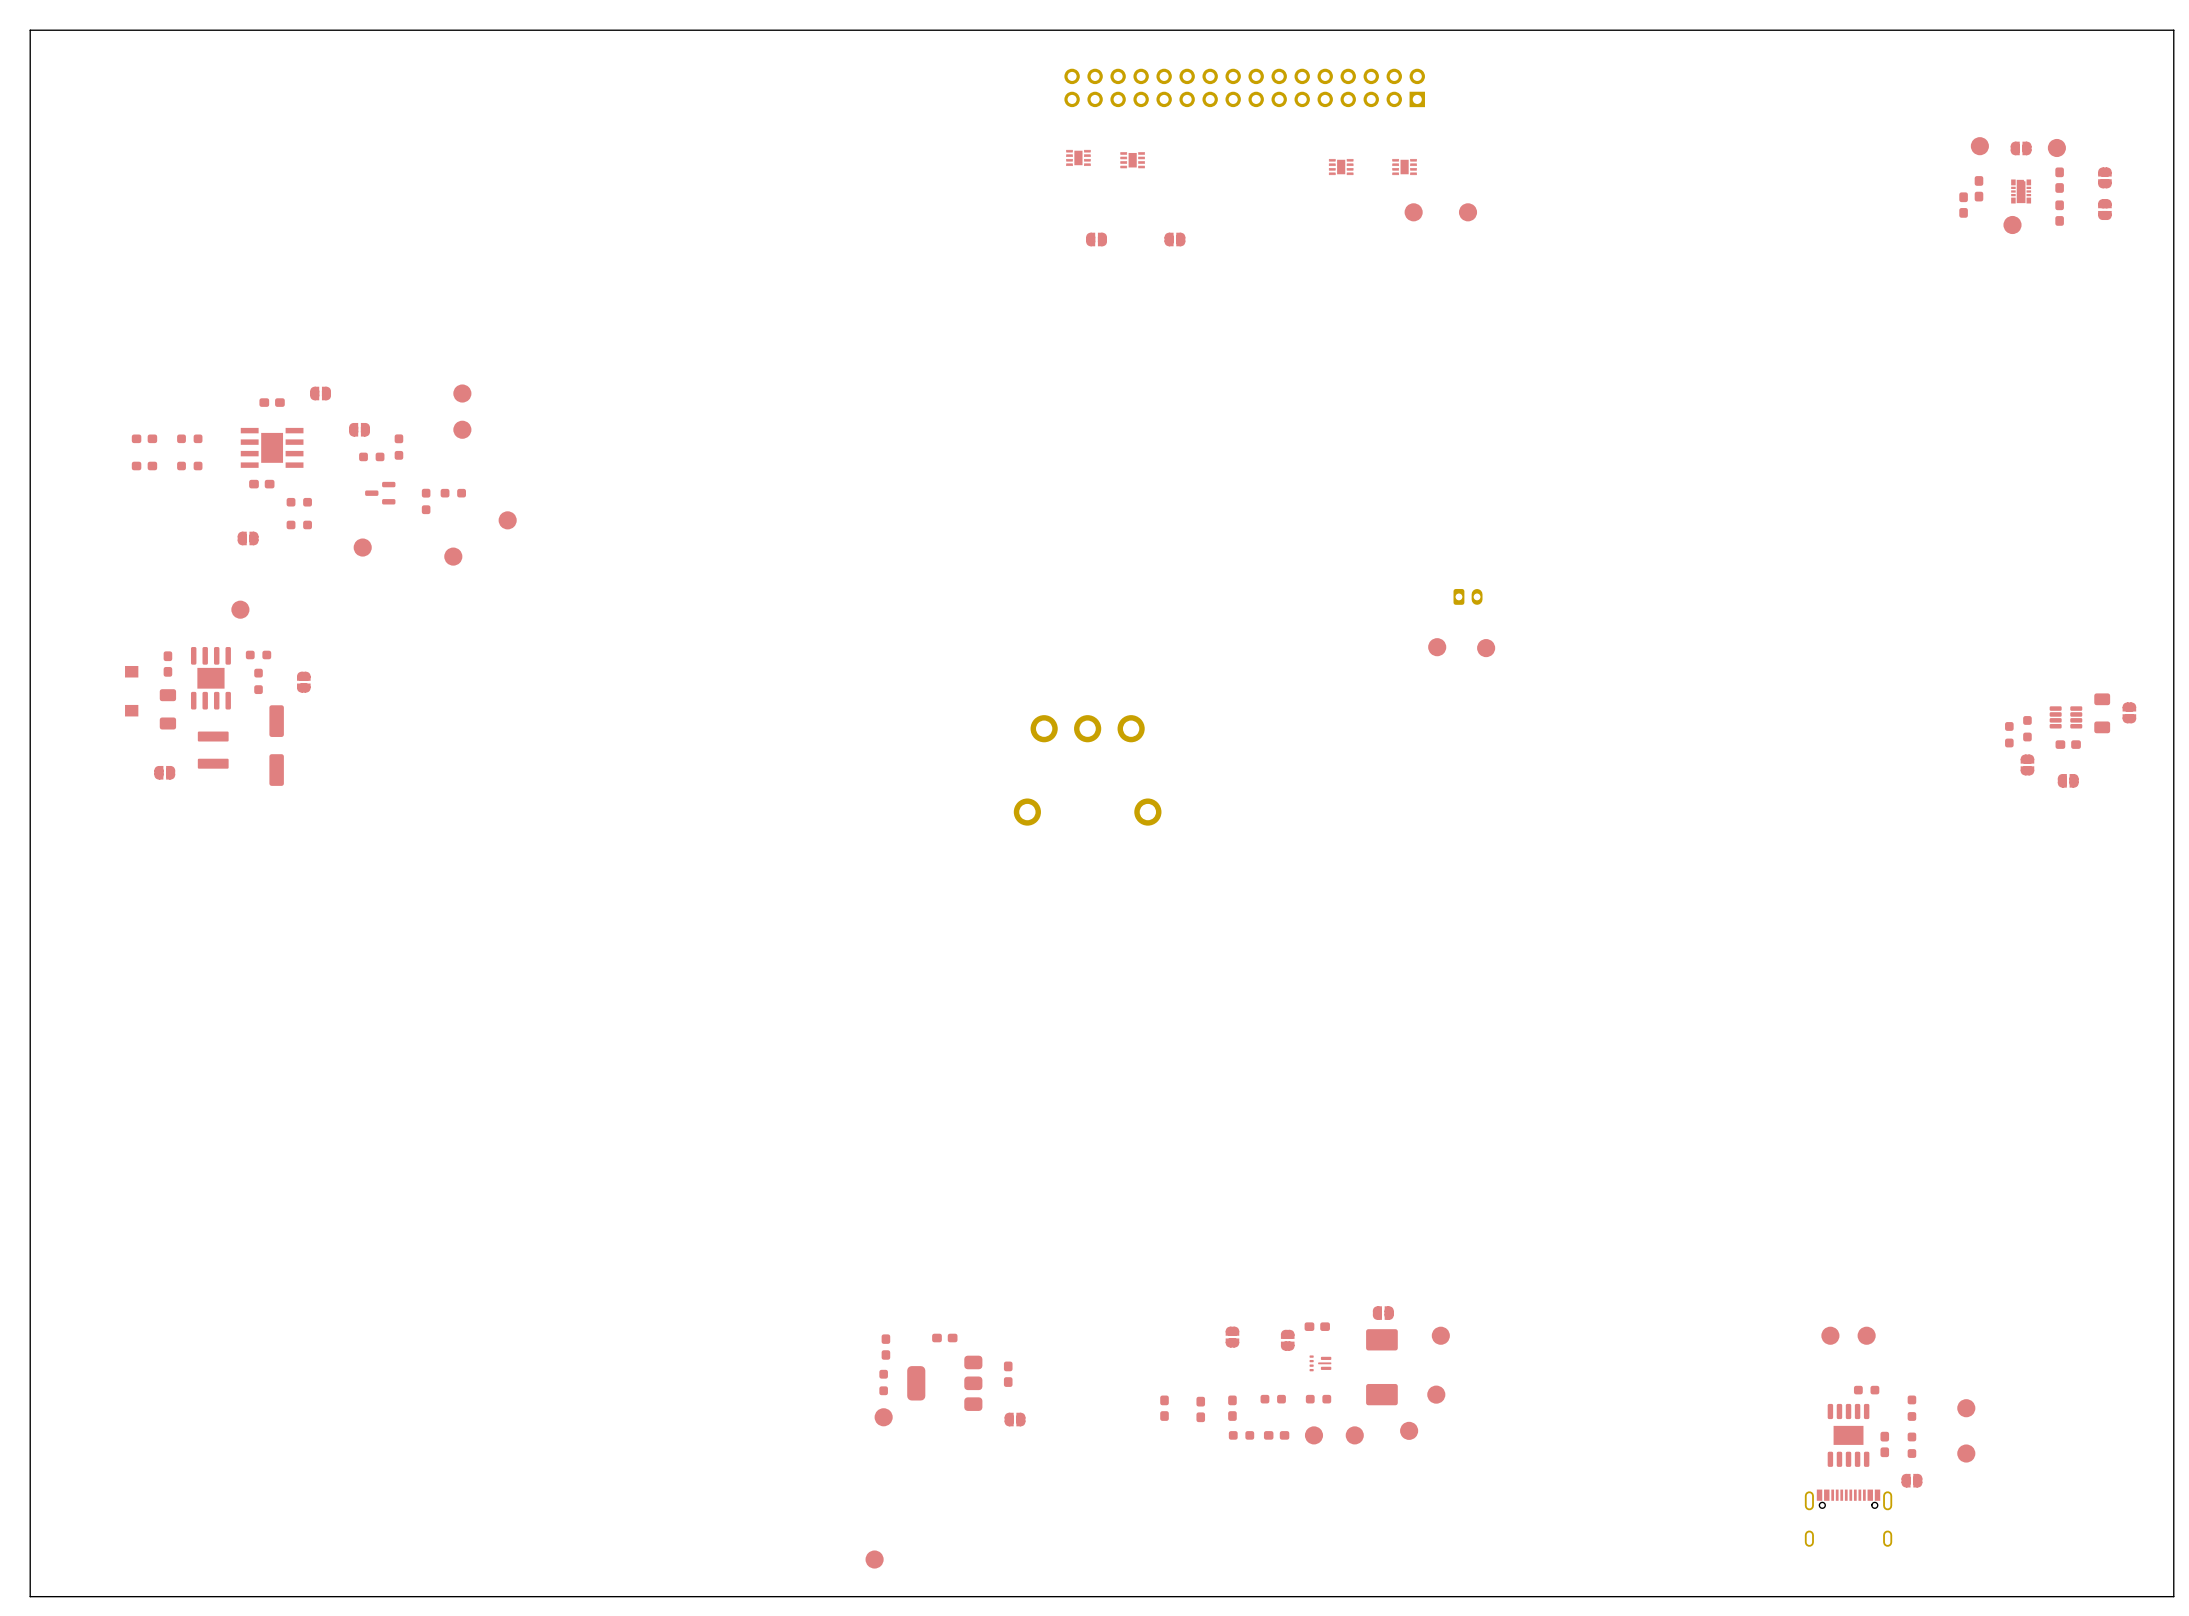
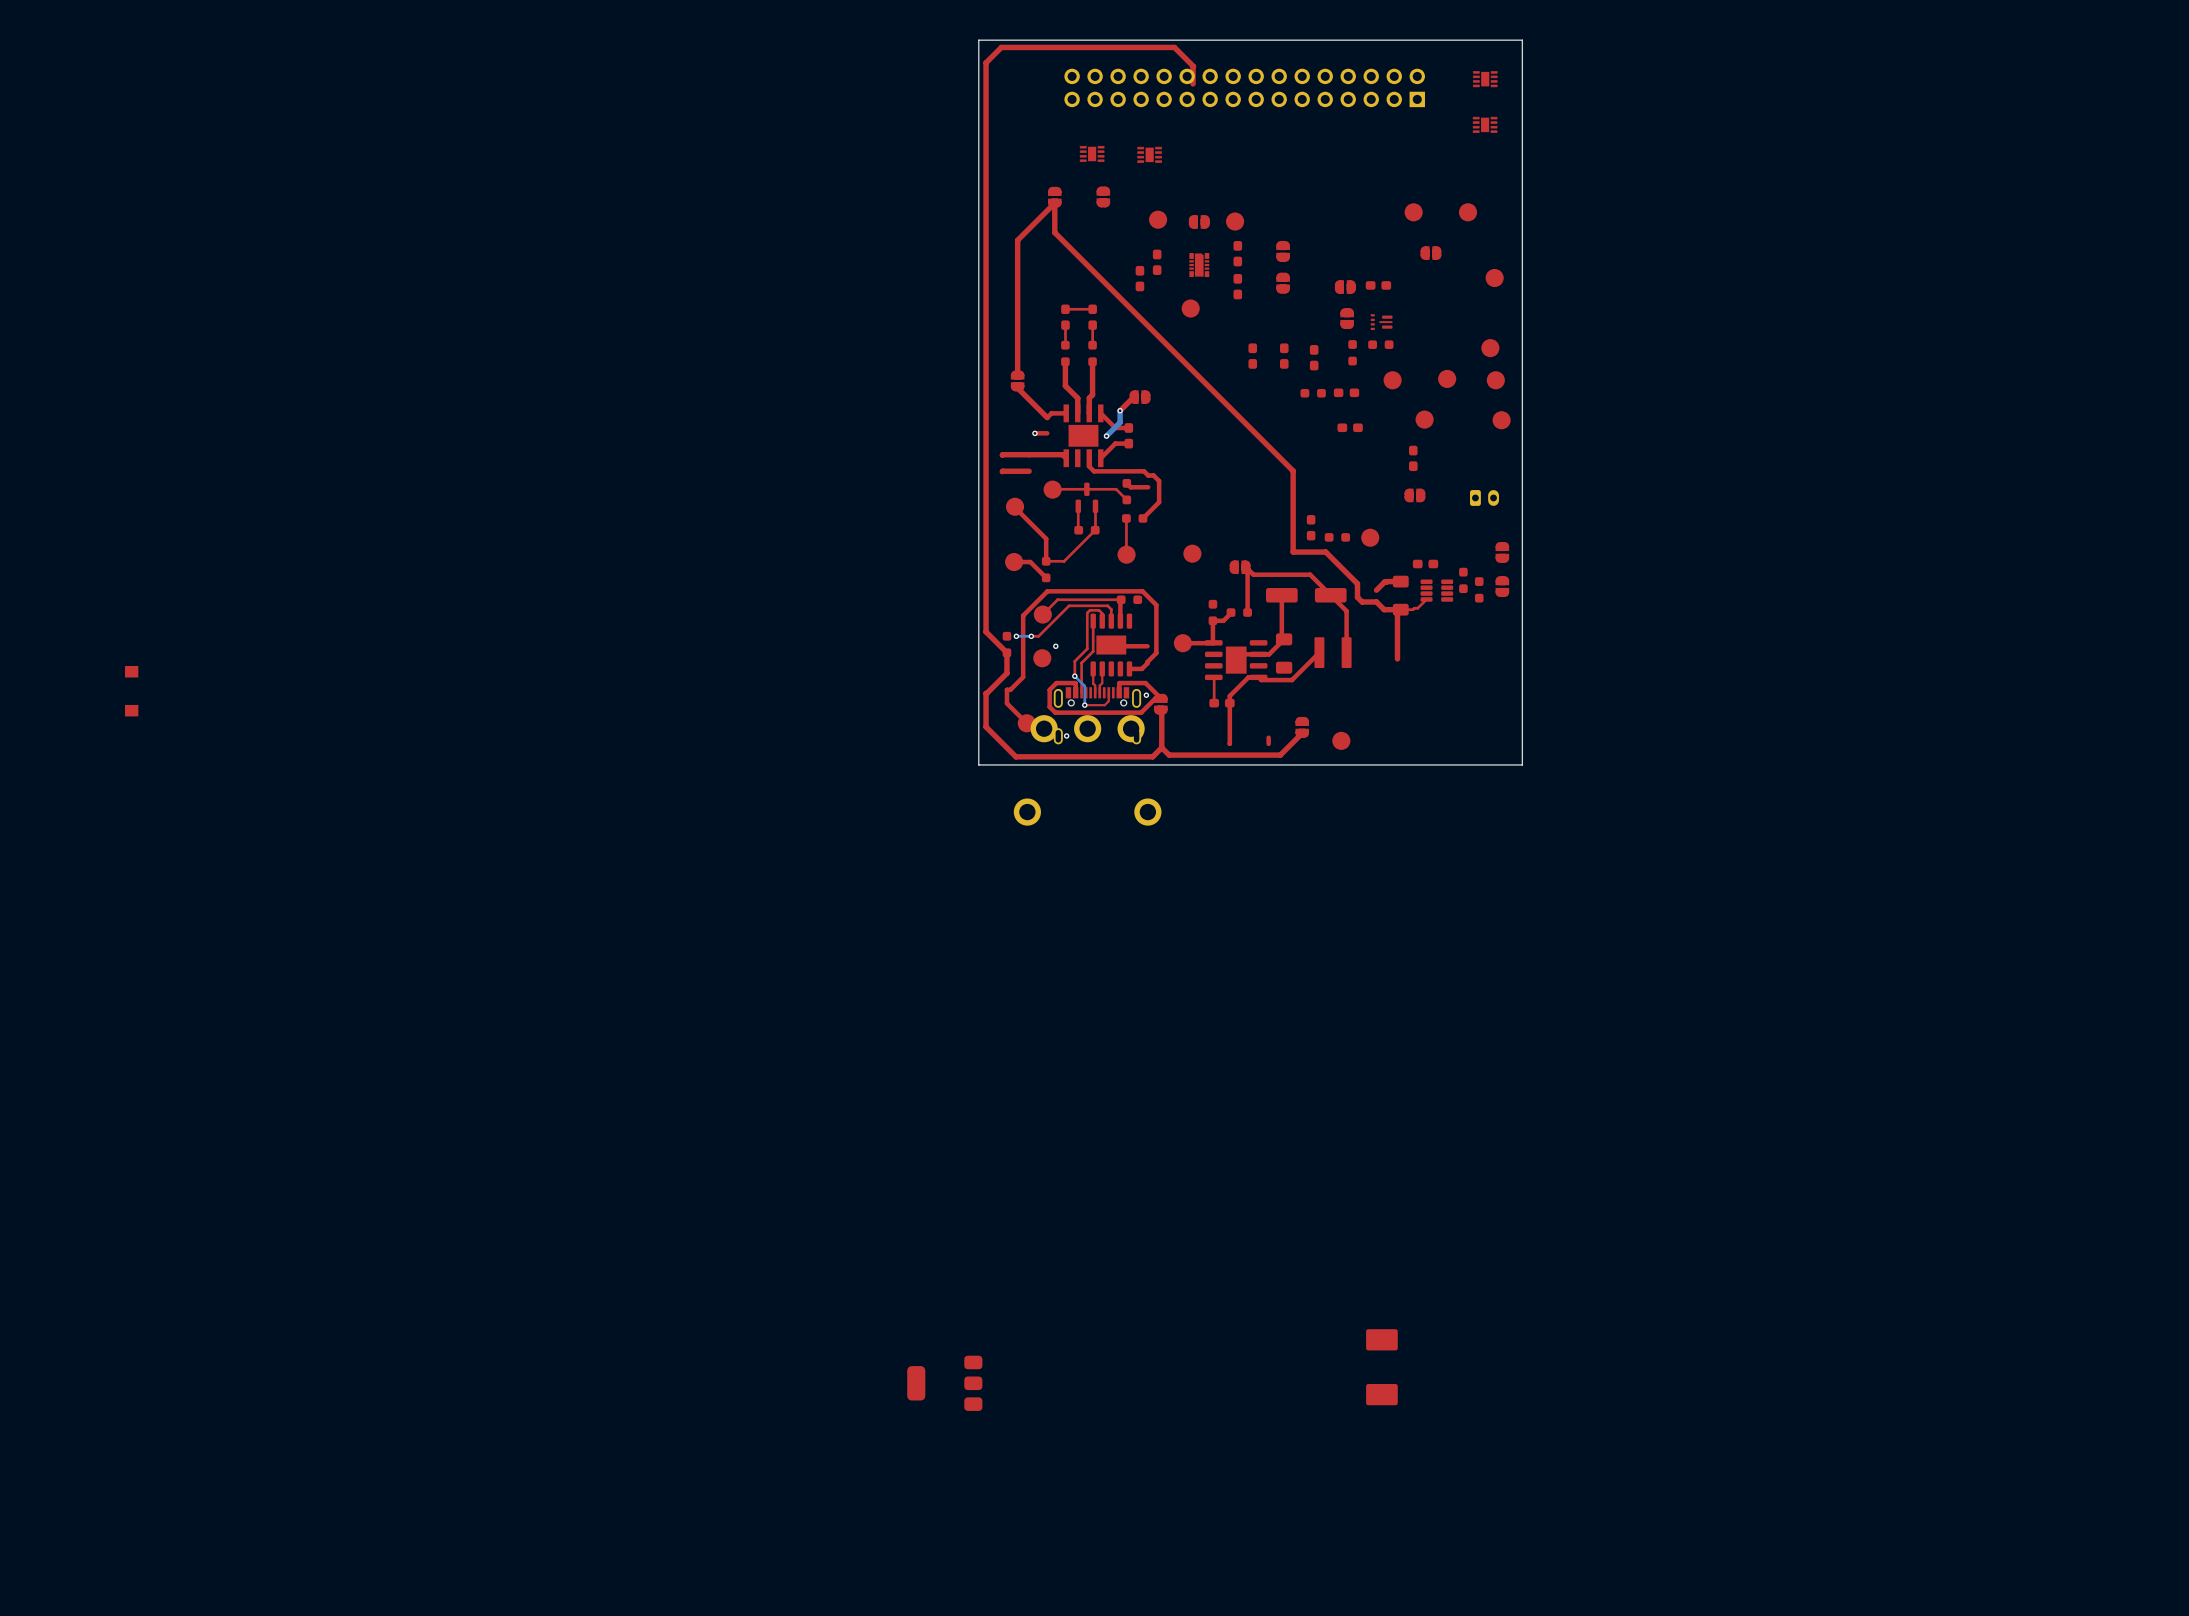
board edge: (2173, 30) (30, 30) (30, 1596) (2173, 1596) (2173, 30) -> none
board edge: none -> (1522, 40) (978, 40) (978, 764) (1522, 764) (1522, 40)
part: none -> (1485, 79)
top track: none -> (1193, 83) (1193, 66) (1174, 47) (1001, 47) (986, 62) (986, 631) (1006, 652) (1006, 673) (986, 693) (986, 726) (1015, 756) (1152, 756) (1161, 747)
part: none -> (1485, 124)
part: (1979, 146) -> none
part: (2056, 147) -> none
part: (2021, 148) -> none
part position: (1078, 157) -> (1092, 153)
part position: (1132, 160) -> (1149, 154)
part: (1341, 167) -> none
part: (1404, 167) -> none
part: (2104, 177) -> none
part: (2059, 180) -> none
part: (1978, 188) -> none
part: (2021, 191) -> none
part: none -> (1054, 197)
part: none -> (1103, 197)
part: (1963, 205) -> none
part: (2104, 209) -> none
part: (2059, 213) -> none
part: none -> (1158, 219)
part: none -> (1235, 221)
part: (2012, 225) -> none
part: (1096, 239) -> none
part position: (1174, 239) -> (1199, 221)
part: none -> (1283, 251)
part: none -> (1237, 253)
part: none -> (1430, 253)
part: none -> (1157, 262)
part: none -> (1199, 265)
part: none -> (1139, 278)
part: none -> (1494, 278)
part: none -> (1283, 283)
part: none -> (1378, 285)
part: none -> (1237, 286)
part: none -> (1345, 287)
part: none -> (1190, 308)
top track: none -> (1092, 309) (1065, 309)
part: none -> (1065, 317)
part: none -> (1092, 317)
part: none -> (1347, 318)
part: none -> (1381, 322)
top track: none -> (1065, 325) (1065, 345)
top track: none -> (1092, 325) (1092, 345)
part: none -> (1380, 344)
part: none -> (1490, 348)
part: none -> (1352, 352)
part: none -> (1065, 353)
part: none -> (1092, 353)
part: none -> (1252, 356)
part: none -> (1284, 356)
part: none -> (1314, 357)
top track: none -> (1065, 361) (1065, 385) (1077, 398) (1077, 413)
top track: none -> (1092, 361) (1092, 394) (1089, 398) (1089, 413)
top track: none -> (1017, 375) (1017, 240) (1054, 203) (1054, 232) (1293, 471) (1293, 552) (1325, 552) (1357, 583) (1357, 597) (1362, 601) (1376, 601) (1384, 609) (1400, 609)
part: none -> (1447, 378)
part: none -> (1017, 380)
part: none -> (1392, 380)
part: none -> (1495, 380)
top track: none -> (1017, 386) (1047, 417) (1051, 413) (1066, 413)
part: none -> (1346, 392)
part: (320, 393) -> none
part: (462, 393) -> none
part: none -> (1313, 393)
top track: none -> (1134, 397) (1120, 410)
part: none -> (1140, 397)
part: (272, 402) -> none
bottom track: none -> (1120, 410) (1120, 422) (1106, 436)
via: none -> (1120, 410)
top track: none -> (1100, 413) (1115, 427) (1128, 427)
part: none -> (1424, 419)
part: none -> (1501, 420)
part: none -> (1350, 427)
part: (359, 429) -> none
part: (462, 429) -> none
via: none -> (1034, 433)
top track: none -> (1047, 433) (1035, 433)
part: none -> (1083, 435)
part: none -> (1128, 435)
via: none -> (1106, 436)
part: (144, 438) -> none
part: (189, 438) -> none
top track: none -> (1128, 443) (1115, 443) (1100, 458)
part: (272, 447) -> none
part: (398, 447) -> none
top track: none -> (1002, 455) (1062, 454) (1066, 458)
part: (371, 456) -> none
top track: none -> (1089, 458) (1089, 466) (1094, 471) (1144, 471) (1148, 475) (1153, 475) (1159, 481) (1159, 502) (1142, 518)
part: none -> (1413, 458)
part: (144, 465) -> none
part: (189, 465) -> none
top track: none -> (1029, 471) (1002, 471)
top track: none -> (1126, 483) (1130, 487) (1148, 487)
part: (261, 484) -> none
top track: none -> (1052, 489) (1116, 489) (1126, 499)
part: none -> (1052, 489)
part: none -> (1126, 491)
part: (380, 493) -> none
part: (453, 493) -> none
part: none -> (1414, 495)
part: none -> (1086, 497)
part: (426, 501) -> none
part: (299, 502) -> none
part: none -> (1015, 506)
top track: none -> (1078, 506) (1078, 530)
top track: none -> (1095, 506) (1095, 529) (1064, 561) (1046, 561) (1046, 538) (1015, 506)
top track: none -> (1126, 518) (1126, 554)
part: none -> (1134, 518)
part: (507, 520) -> none
part: (299, 524) -> none
part: none -> (1311, 527)
part: none -> (1086, 530)
part: none -> (1337, 537)
part: none -> (1370, 537)
part: (248, 538) -> none
part: (362, 547) -> none
part: none -> (1502, 552)
part: none -> (1192, 553)
part: none -> (1126, 554)
part: (453, 556) -> none
top track: none -> (1014, 562) (1030, 562) (1046, 577)
part: none -> (1014, 562)
part: none -> (1425, 564)
part: none -> (1240, 567)
top track: none -> (1246, 567) (1253, 574) (1310, 574) (1346, 611) (1346, 652)
top track: none -> (1247, 568) (1247, 612)
part: none -> (1046, 569)
part: none -> (1463, 580)
top track: none -> (1400, 581) (1384, 581) (1376, 590)
part: none -> (1502, 586)
part: none -> (1479, 589)
part: none -> (1436, 590)
top track: none -> (1281, 595) (1281, 637) (1284, 639) (1269, 654) (1241, 654) (1236, 660)
part: none -> (1306, 595)
part: none -> (1400, 595)
part position: (1468, 596) -> (1484, 497)
part: none -> (1129, 599)
top track: none -> (1426, 599) (1417, 608) (1400, 609)
part: (240, 609) -> none
top track: none -> (1400, 609) (1397, 613) (1397, 658)
part: none -> (1212, 612)
top track: none -> (1231, 612) (1223, 620) (1212, 620) (1213, 643) (1182, 643)
part: none -> (1239, 612)
top track: none -> (1042, 614) (1057, 599) (1121, 599) (1120, 621)
part: none -> (1042, 614)
top track: none -> (1093, 621) (1093, 651) (1081, 663) (1081, 692)
top track: none -> (1102, 621) (1102, 613) (1099, 610) (1089, 610) (1087, 612) (1087, 648) (1074, 661) (1074, 676)
top track: none -> (1111, 621) (1111, 609) (1107, 605) (1069, 605) (1038, 636) (1031, 636)
via: none -> (1016, 636)
bottom track: none -> (1031, 636) (1016, 636)
via: none -> (1031, 636)
part: none -> (1182, 643)
part: none -> (1006, 644)
top track: none -> (1111, 645) (1147, 646)
part: none -> (1111, 645)
via: none -> (1055, 646)
part: (1437, 647) -> none
part: (1486, 648) -> none
top track: none -> (1319, 652) (1291, 680) (1261, 680) (1258, 677) (1248, 677) (1229, 696) (1229, 743)
part: none -> (1333, 652)
part: none -> (1284, 653)
part: (258, 654) -> none
part: none -> (1042, 658)
part: none -> (1236, 660)
part: (167, 664) -> none
top track: none -> (1093, 668) (1095, 692)
top track: none -> (1102, 668) (1102, 683) (1099, 685) (1099, 692)
top track: none -> (1129, 668) (1141, 668) (1156, 653) (1156, 605) (1142, 591) (1047, 591) (1023, 615) (1023, 677) (1010, 689) (1006, 689) (1006, 703) (1026, 723)
bottom track: none -> (1074, 676) (1084, 686) (1084, 705)
via: none -> (1074, 676)
top track: none -> (1213, 677) (1214, 703)
part: (210, 678) -> none
part: (258, 681) -> none
part: (303, 682) -> none
top track: none -> (1108, 692) (1108, 701) (1104, 705) (1084, 705)
top track: none -> (1119, 692) (1119, 683) (1145, 683) (1160, 698) (1155, 698) (1141, 712) (1055, 712) (1049, 706) (1049, 689) (1056, 683) (1075, 683) (1075, 692)
via: none -> (1146, 695)
part: none -> (1221, 703)
part: none -> (1160, 704)
via: none -> (1084, 705)
part: (167, 709) -> none
top track: none -> (1160, 710) (1161, 747)
part: (2129, 712) -> none
part: (2102, 713) -> none
part: none -> (1097, 715)
part: (2065, 717) -> none
part: none -> (1026, 723)
part: none -> (1302, 727)
part: (2027, 728) -> none
top track: none -> (1302, 733) (1280, 755) (1169, 755) (1161, 747)
part: (2009, 734) -> none
via: none -> (1066, 735)
top track: none -> (1268, 737) (1268, 743)
part: none -> (1341, 740)
part: (2068, 744) -> none
part: (276, 745) -> none
part: (213, 750) -> none
part: (2027, 764) -> none
part: (164, 772) -> none
part: (2068, 780) -> none
part: (1383, 1313) -> none
part: (1317, 1326) -> none
part: (1440, 1335) -> none
part: (1830, 1335) -> none
part: (1866, 1335) -> none
part: (1232, 1337) -> none
part: (944, 1338) -> none
part: (1287, 1340) -> none
part: (885, 1347) -> none
part: (1320, 1363) -> none
part: (1008, 1374) -> none
part: (883, 1382) -> none
part: (1866, 1390) -> none
part: (1436, 1394) -> none
part: (1273, 1399) -> none
part: (1318, 1399) -> none
part: (1164, 1408) -> none
part: (1232, 1408) -> none
part: (1911, 1408) -> none
part: (1966, 1408) -> none
part: (1200, 1409) -> none
part: (883, 1417) -> none
part: (1015, 1419) -> none
part: (1409, 1430) -> none
part: (1241, 1435) -> none
part: (1276, 1435) -> none
part: (1313, 1435) -> none
part: (1354, 1435) -> none
part: (1848, 1435) -> none
part: (1884, 1444) -> none
part: (1911, 1445) -> none
part: (1966, 1453) -> none
part: (1911, 1480) -> none
part: (1848, 1518) -> none
part: (874, 1559) -> none

